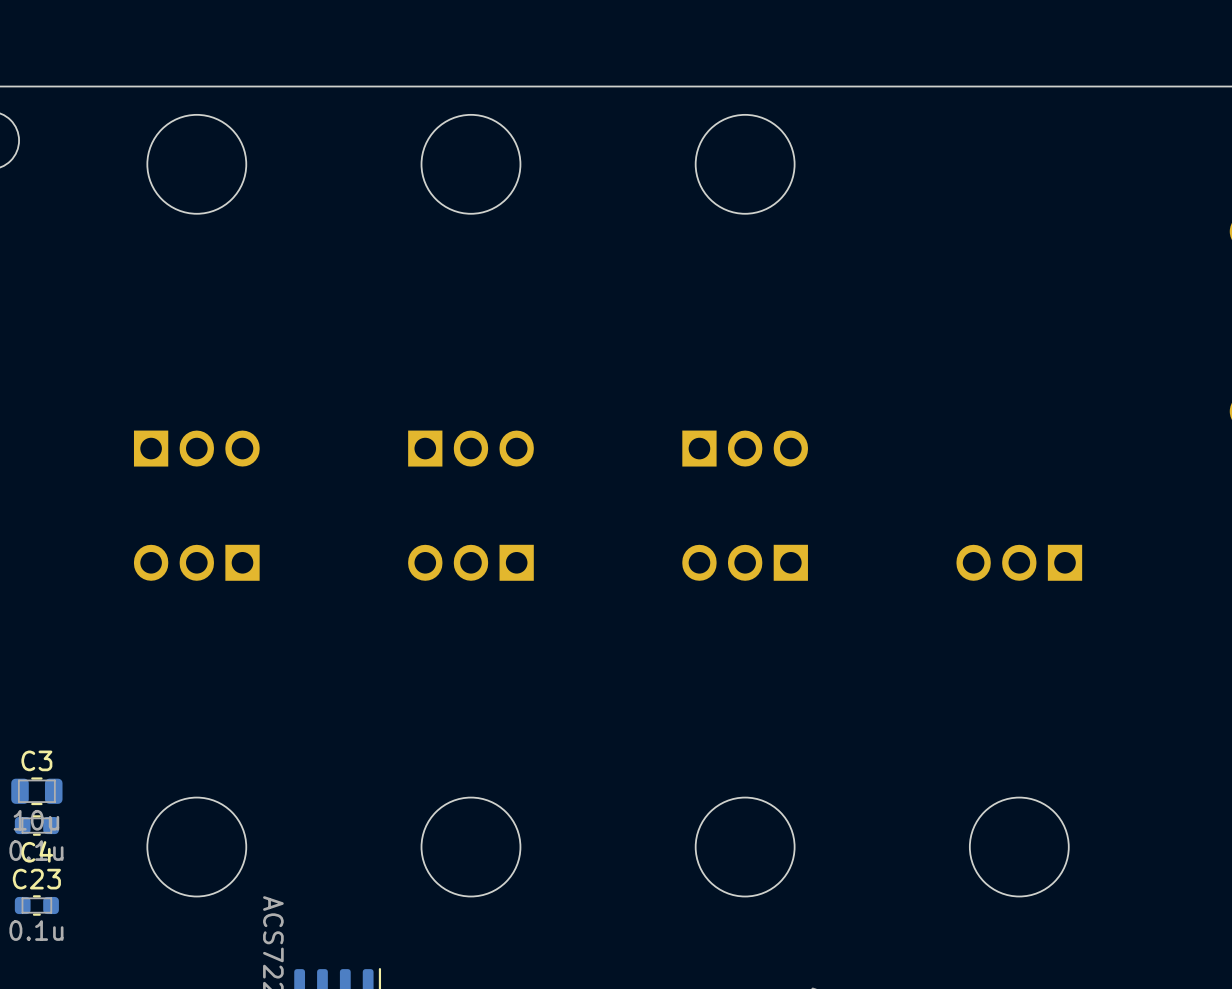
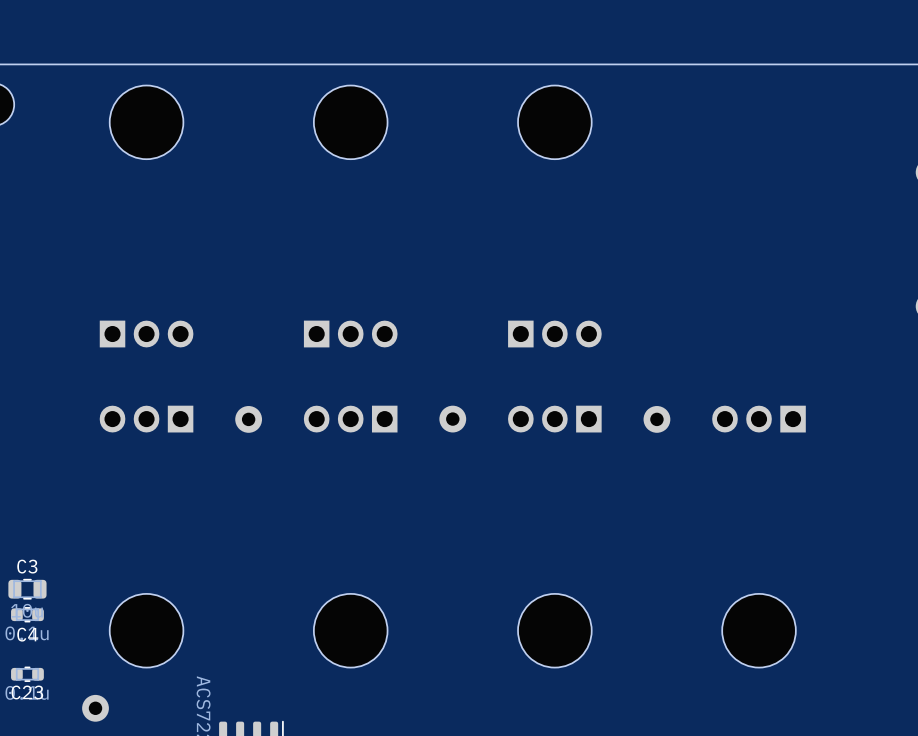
part: none -> (452, 419)
part: none -> (248, 419)
part: none -> (656, 419)
C23 name position: C23 (36, 879) -> C23 (27, 692)
part: none -> (95, 708)

